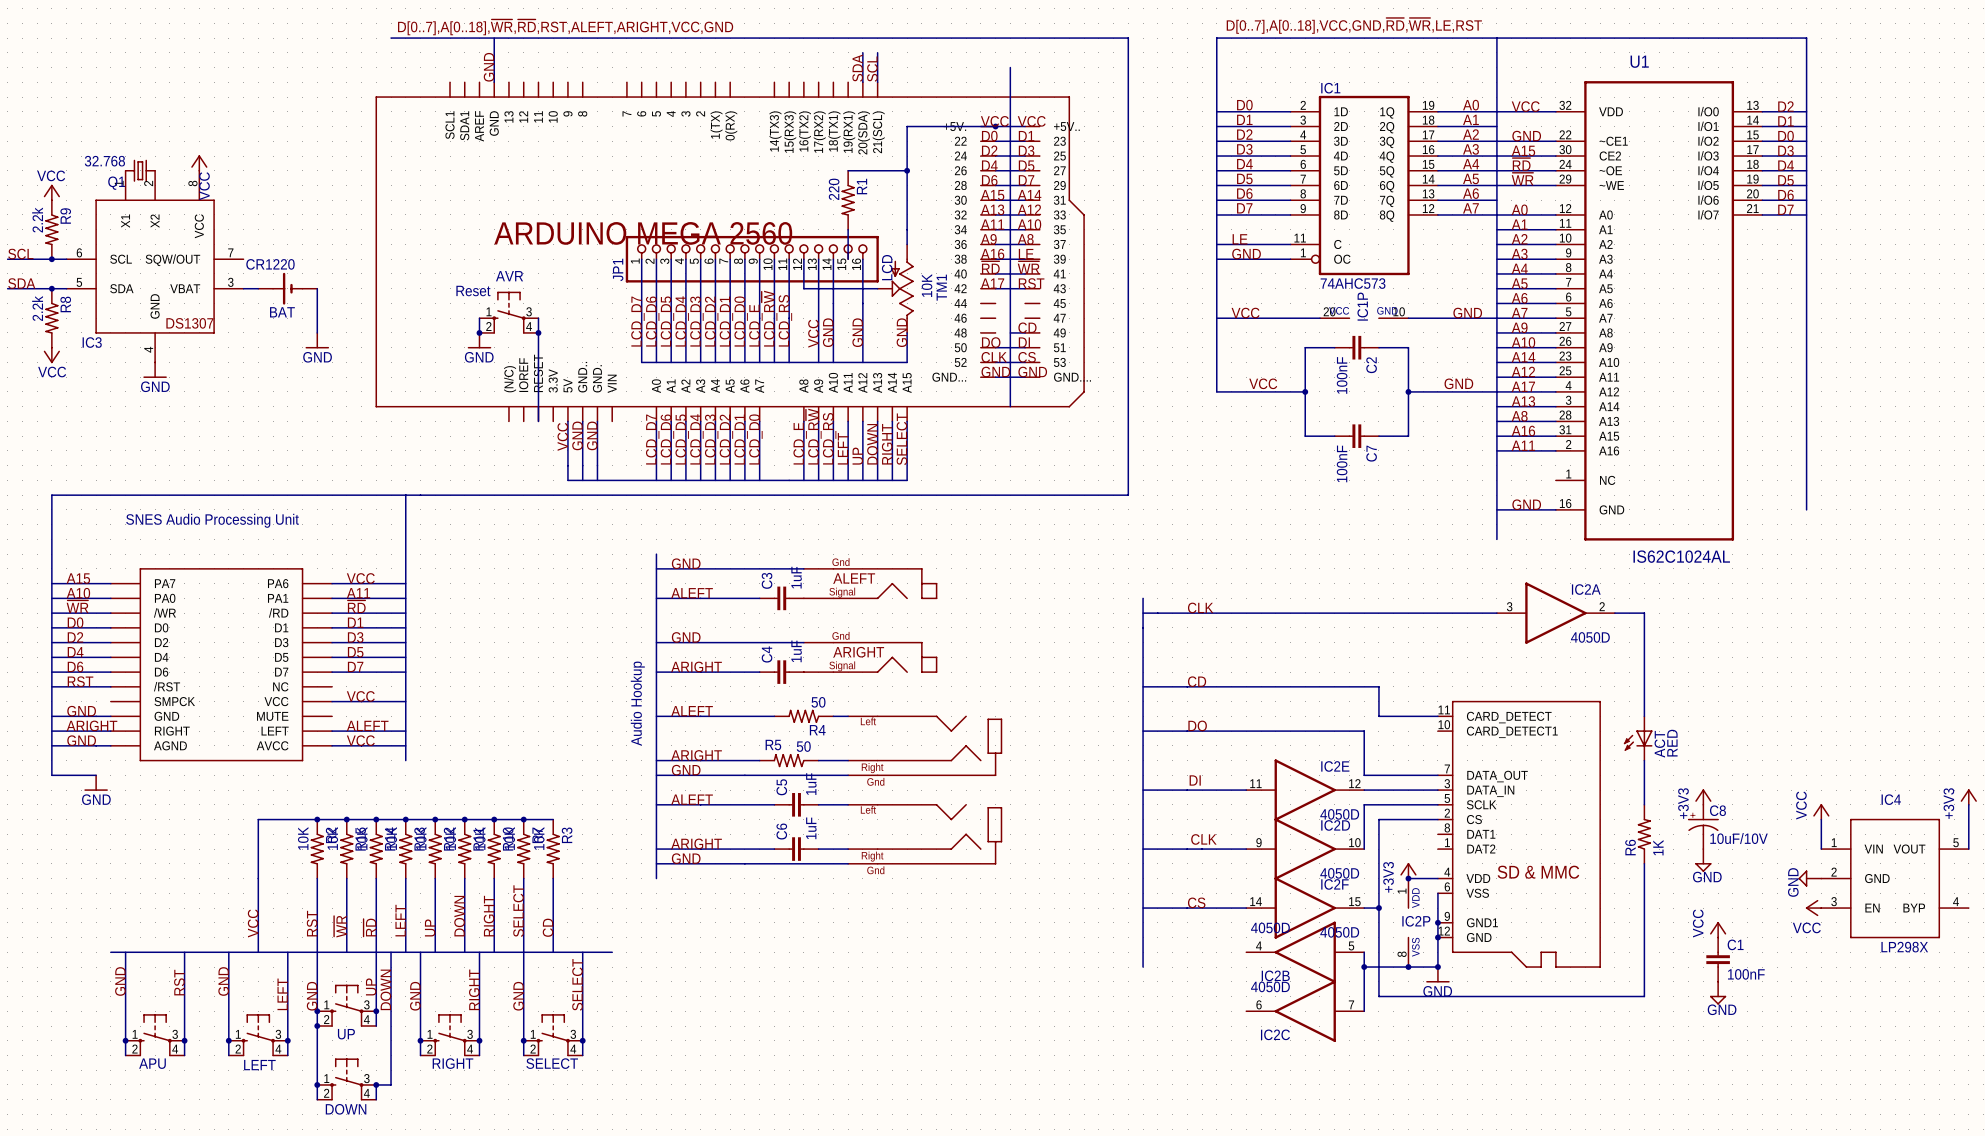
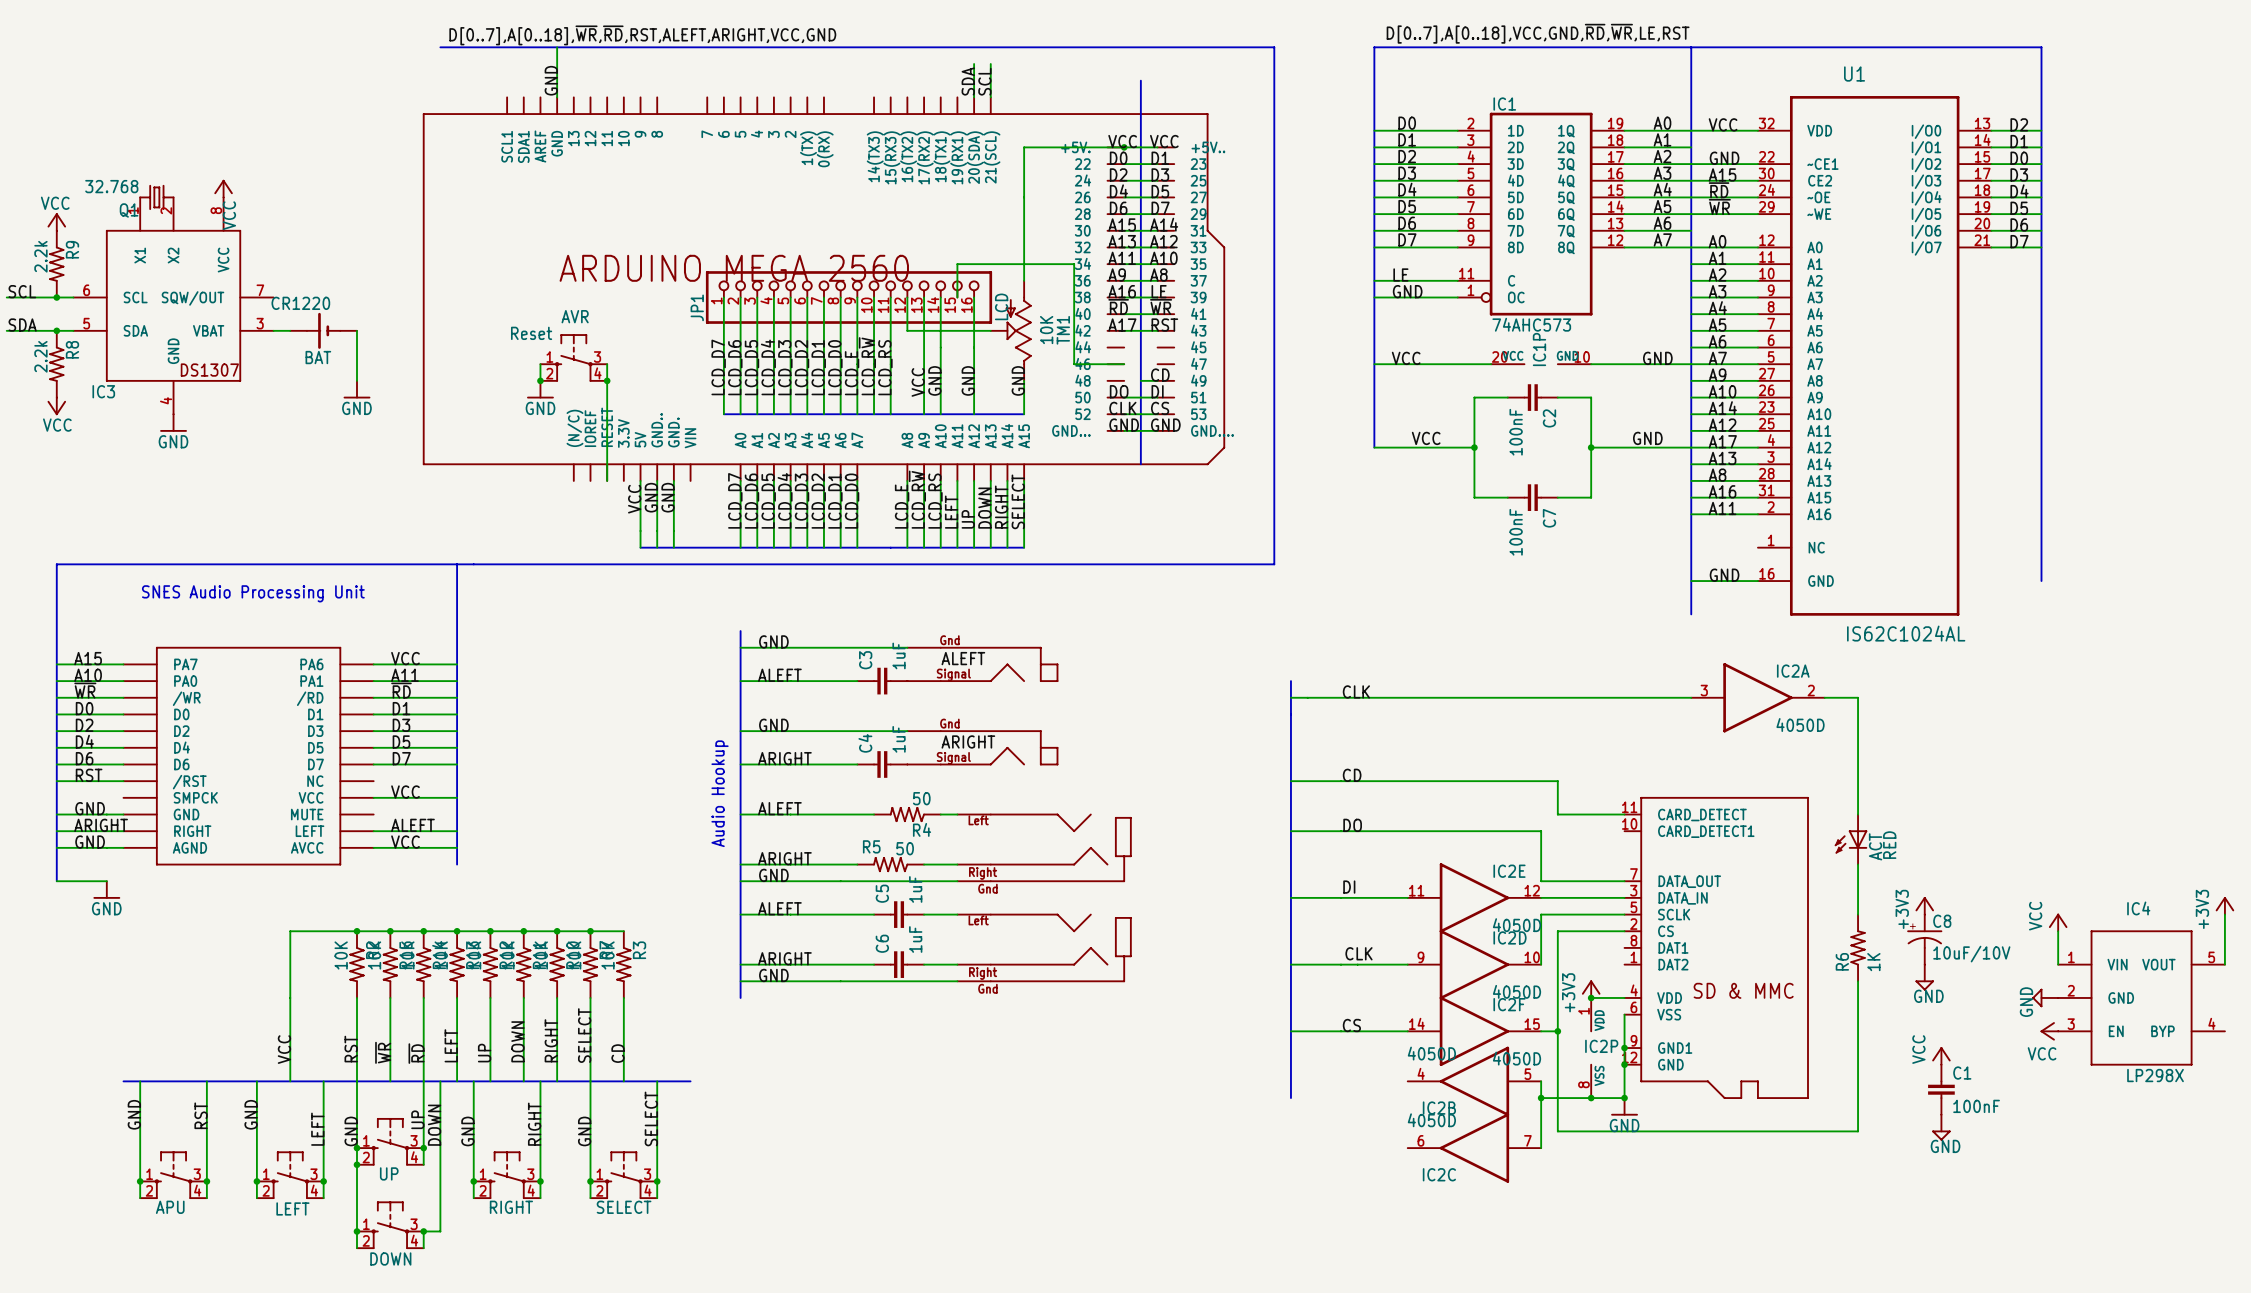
wire: (848, 170) (907, 170) -> none
junction: (907, 170) -> none
R1: 220 (848, 200) -> none
wire: none -> (957, 264) (1074, 264) (1074, 364) (1124, 364)

